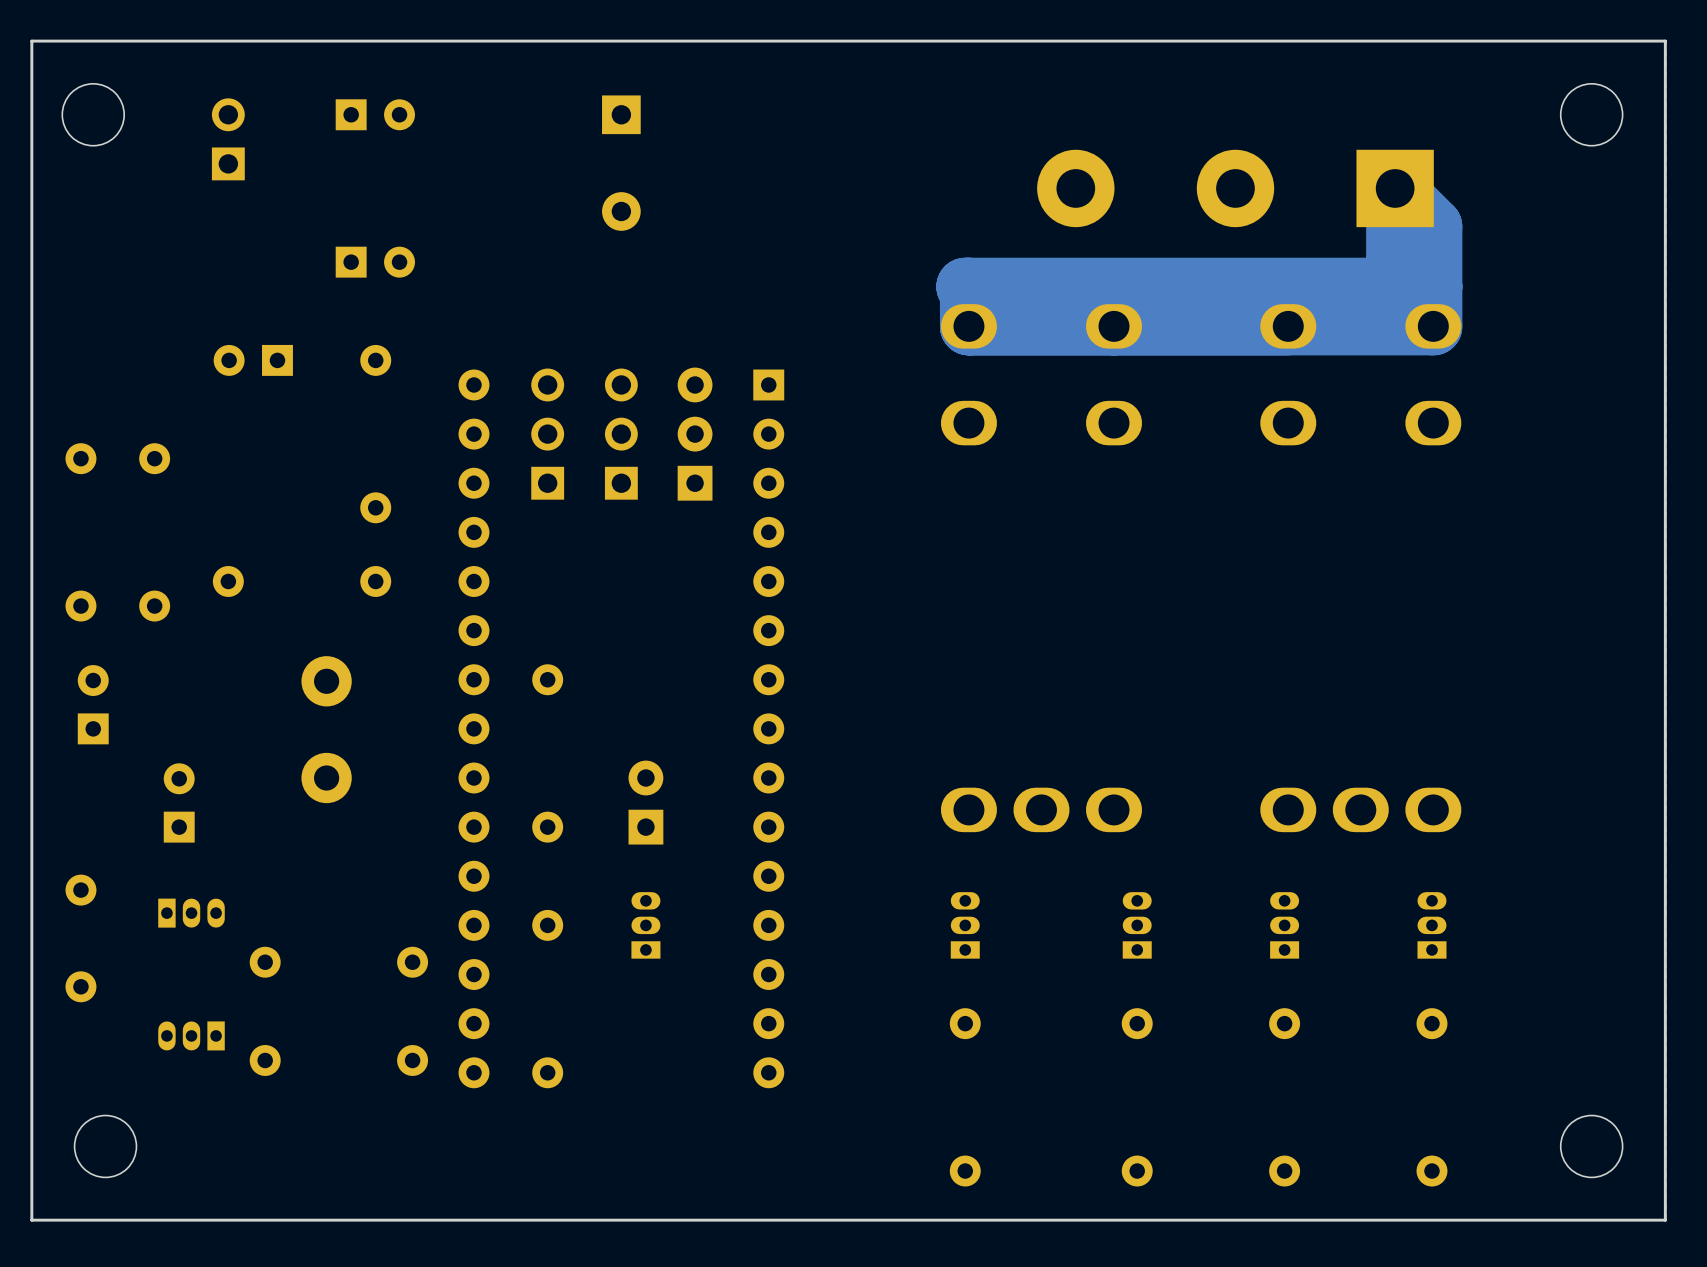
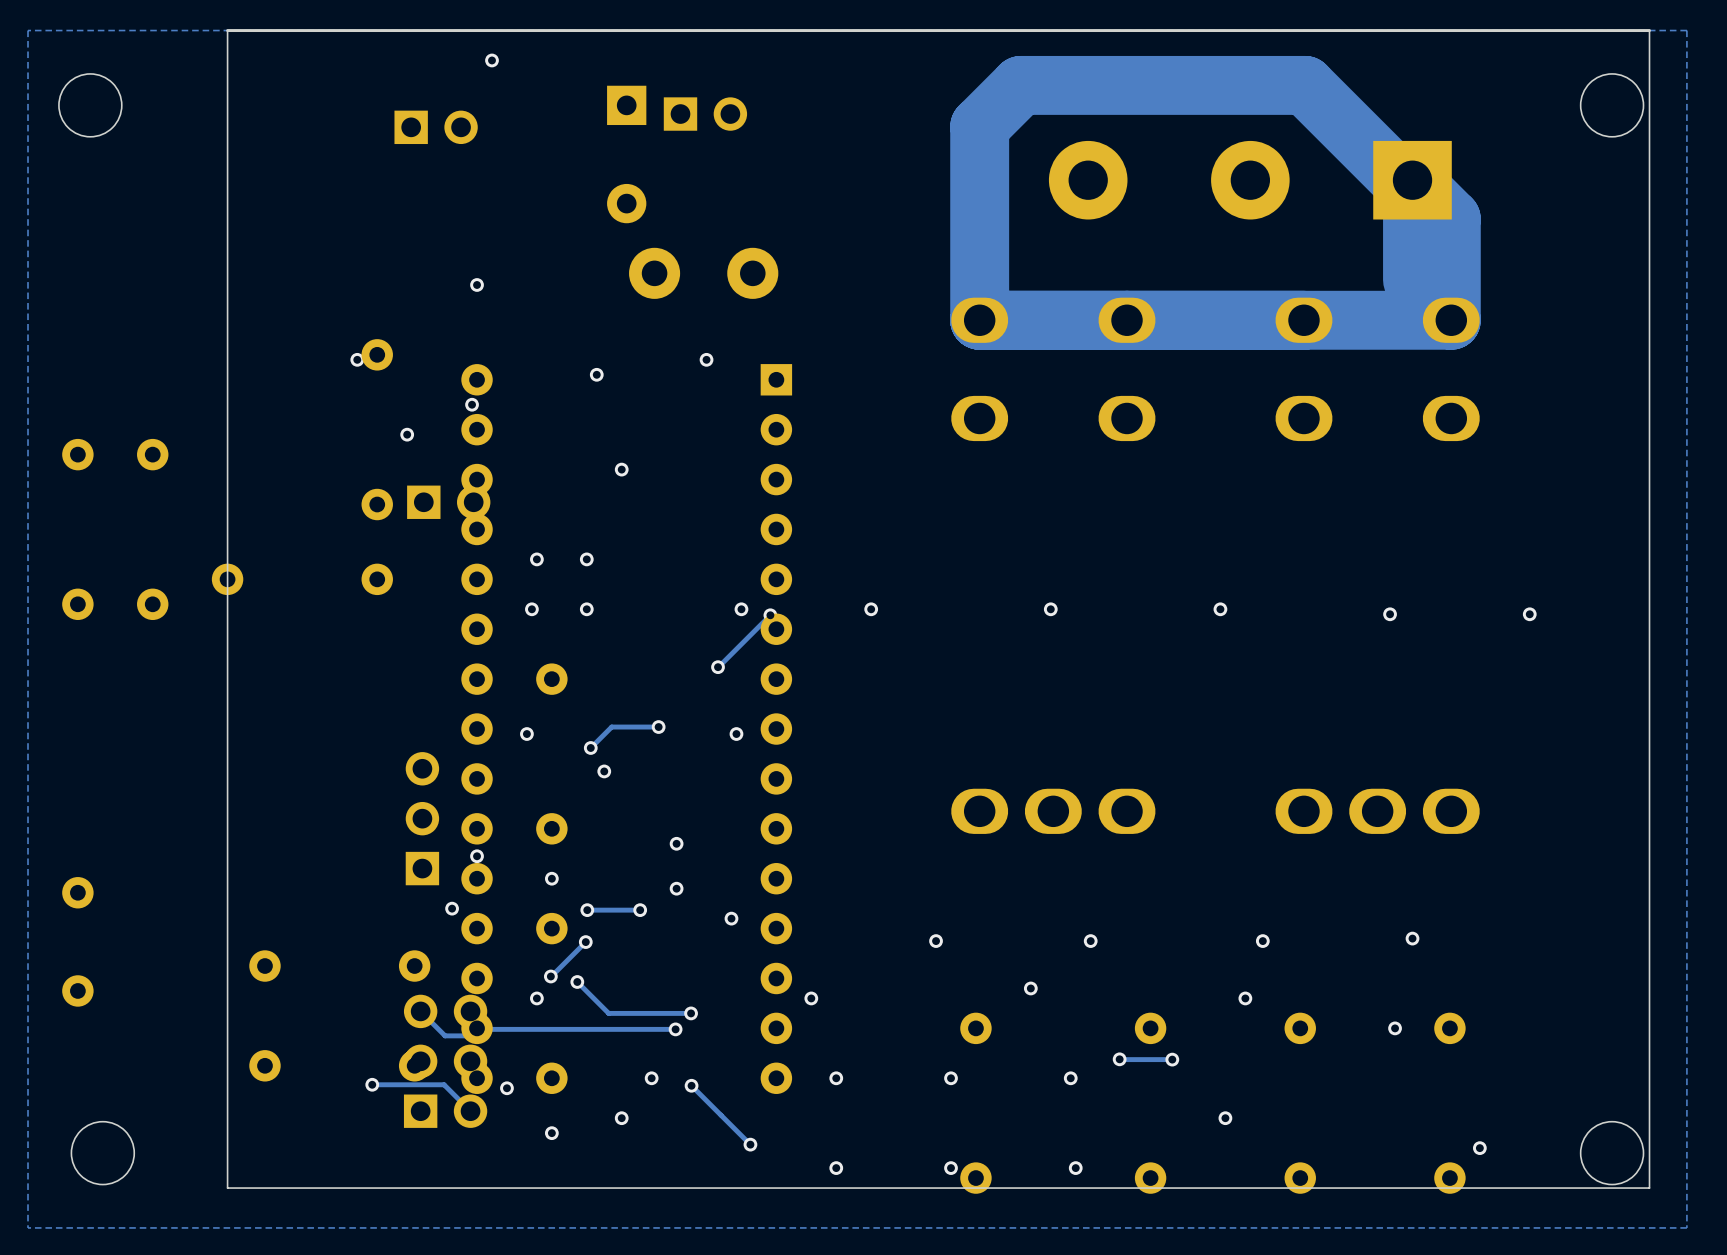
board edge: (1628, 41) (1665, 41) (1665, 1220) (31, 1220) (31, 41) (228, 41) -> (1649, 30) (1649, 1188) (227, 1188) (227, 30)
via: none -> (492, 60)
part: (375, 114) -> none
part: none -> (705, 114)
part rotation: 0° (228, 139) -> 90° clockwise (436, 127)
part position: (228, 139) -> (436, 127)
track: none -> (1406, 185) (1305, 85) (1020, 85) (979, 126) (979, 280)
part: (375, 262) -> none
part: none -> (703, 273)
track: (1433, 286) (965, 286) -> none
via: none -> (477, 284)
part: (253, 360) -> none
via: none -> (357, 359)
via: none -> (706, 359)
via: none -> (596, 374)
via: none -> (472, 404)
part: (547, 434) -> none
part: (621, 434) -> none
part: (695, 434) -> none
via: none -> (407, 434)
via: none -> (621, 469)
part: none -> (448, 502)
via: none -> (536, 559)
via: none -> (586, 559)
via: none -> (531, 609)
via: none -> (586, 609)
via: none -> (741, 609)
via: none -> (871, 609)
via: none -> (1050, 609)
via: none -> (1220, 609)
via: none -> (1390, 614)
via: none -> (1529, 614)
track: none -> (770, 615) (718, 667)
via: none -> (770, 615)
via: none -> (718, 667)
part: (93, 704) -> none
track: none -> (658, 727) (611, 727) (590, 747)
via: none -> (658, 727)
part: (326, 729) -> none
via: none -> (526, 734)
via: none -> (736, 734)
via: none -> (590, 747)
via: none -> (604, 771)
part: (179, 802) -> none
part: (645, 802) -> none
part: none -> (422, 818)
via: none -> (676, 843)
via: none -> (477, 856)
via: none -> (551, 878)
via: none -> (676, 888)
via: none -> (452, 908)
via: none -> (587, 910)
track: none -> (640, 910) (587, 910)
via: none -> (640, 910)
part: (191, 913) -> none
via: none -> (731, 918)
part: (645, 925) -> none
part: (965, 925) -> none
part: (1137, 925) -> none
part: (1284, 925) -> none
part: (1431, 925) -> none
via: none -> (1412, 938)
via: none -> (936, 941)
via: none -> (1090, 941)
via: none -> (1262, 941)
track: none -> (585, 942) (550, 976)
via: none -> (585, 942)
via: none -> (550, 976)
track: none -> (577, 981) (608, 1013) (691, 1013)
via: none -> (577, 981)
via: none -> (1030, 988)
via: none -> (536, 998)
via: none -> (811, 998)
via: none -> (1245, 998)
track: none -> (420, 1011) (445, 1035) (480, 1035) (486, 1029) (675, 1029)
via: none -> (691, 1013)
via: none -> (1395, 1028)
via: none -> (675, 1029)
part: (191, 1035) -> none
track: none -> (1119, 1059) (1172, 1059)
via: none -> (1119, 1059)
via: none -> (1172, 1059)
part: none -> (445, 1061)
via: none -> (651, 1078)
via: none -> (836, 1078)
via: none -> (951, 1078)
via: none -> (1070, 1078)
track: none -> (372, 1084) (444, 1084) (470, 1111)
via: none -> (372, 1084)
track: none -> (691, 1085) (750, 1144)
via: none -> (691, 1085)
via: none -> (506, 1088)
via: none -> (621, 1118)
via: none -> (1225, 1118)
via: none -> (551, 1133)
via: none -> (750, 1144)
via: none -> (1479, 1148)
via: none -> (836, 1168)
via: none -> (951, 1168)
via: none -> (1075, 1168)

